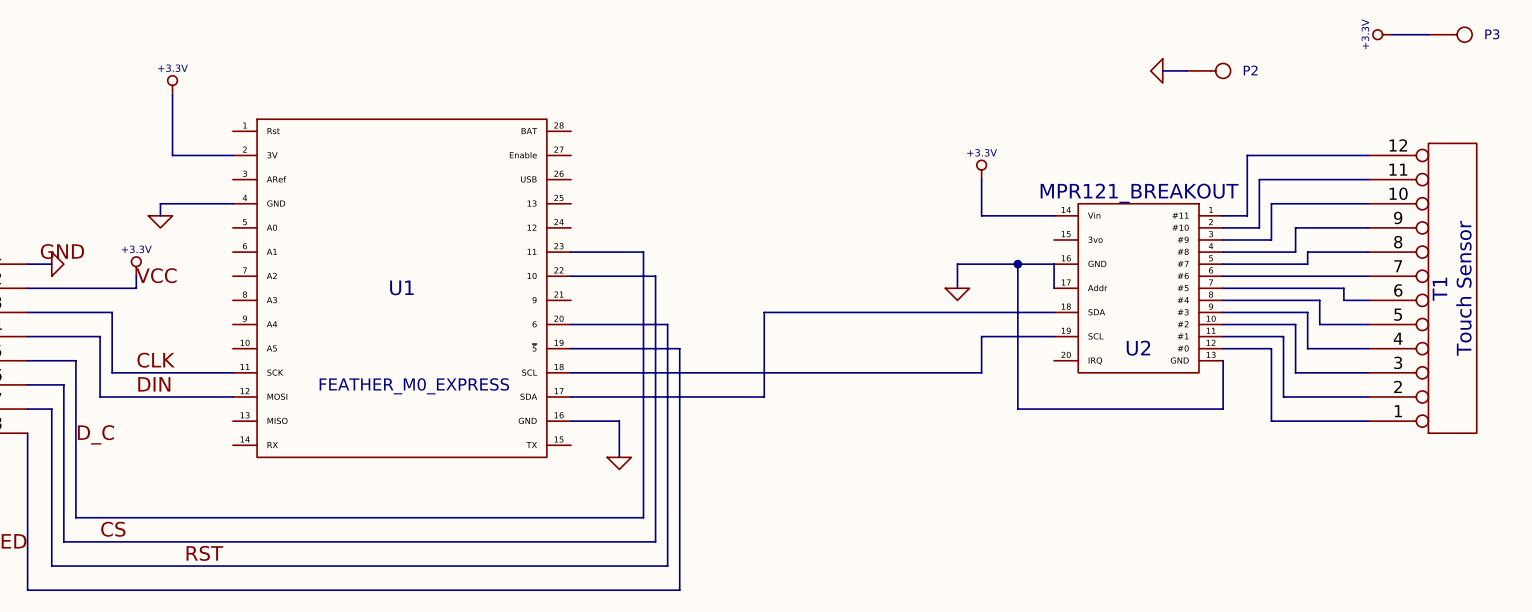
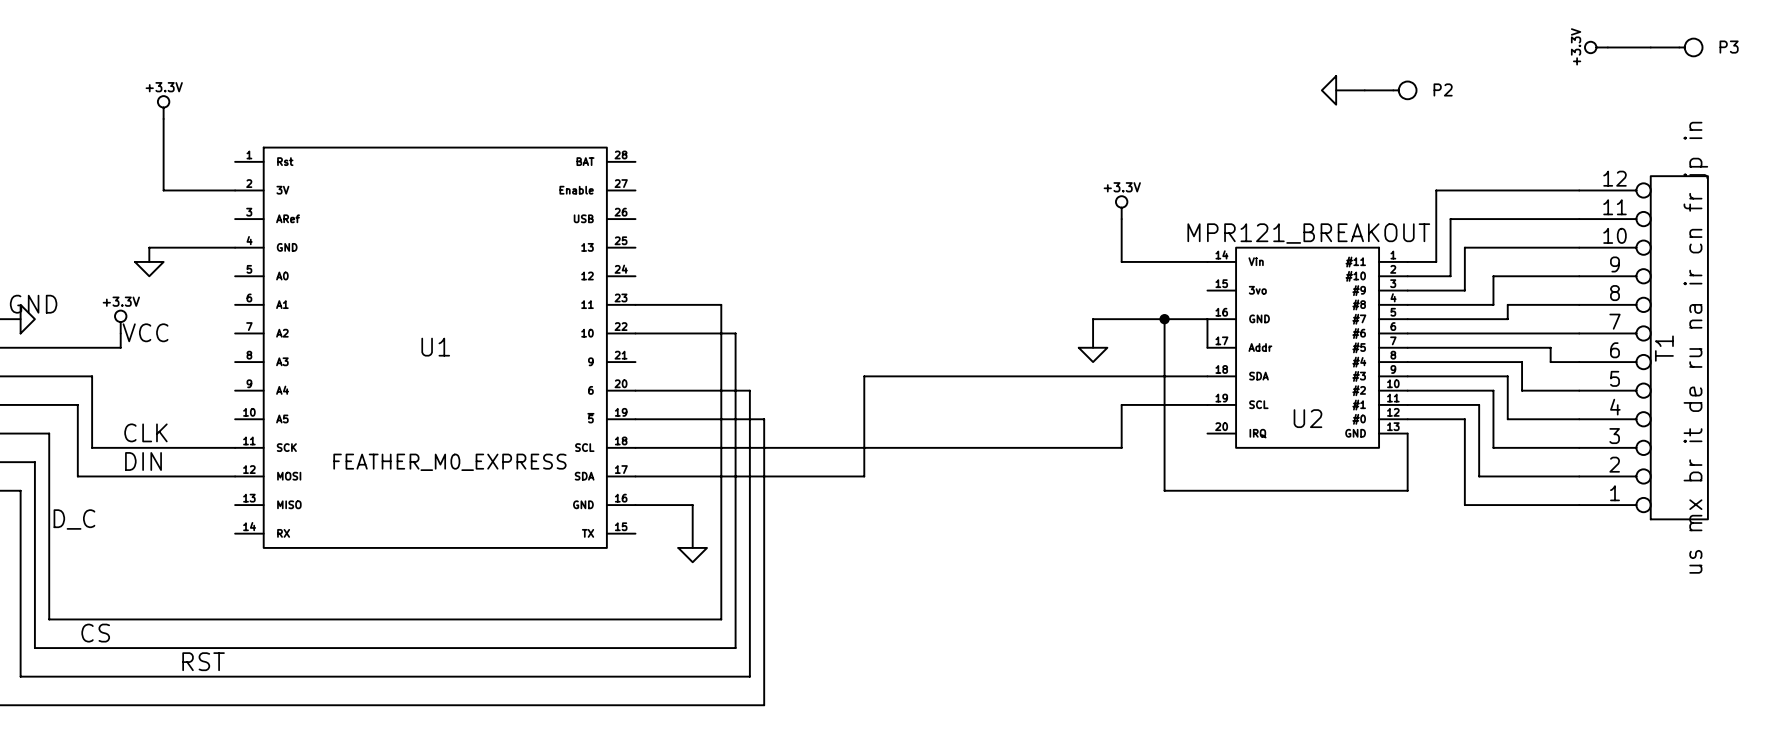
T1 value: Touch Sensor (1463, 288) -> us mx br it de ru na ir cn fr jp in (1695, 347)

